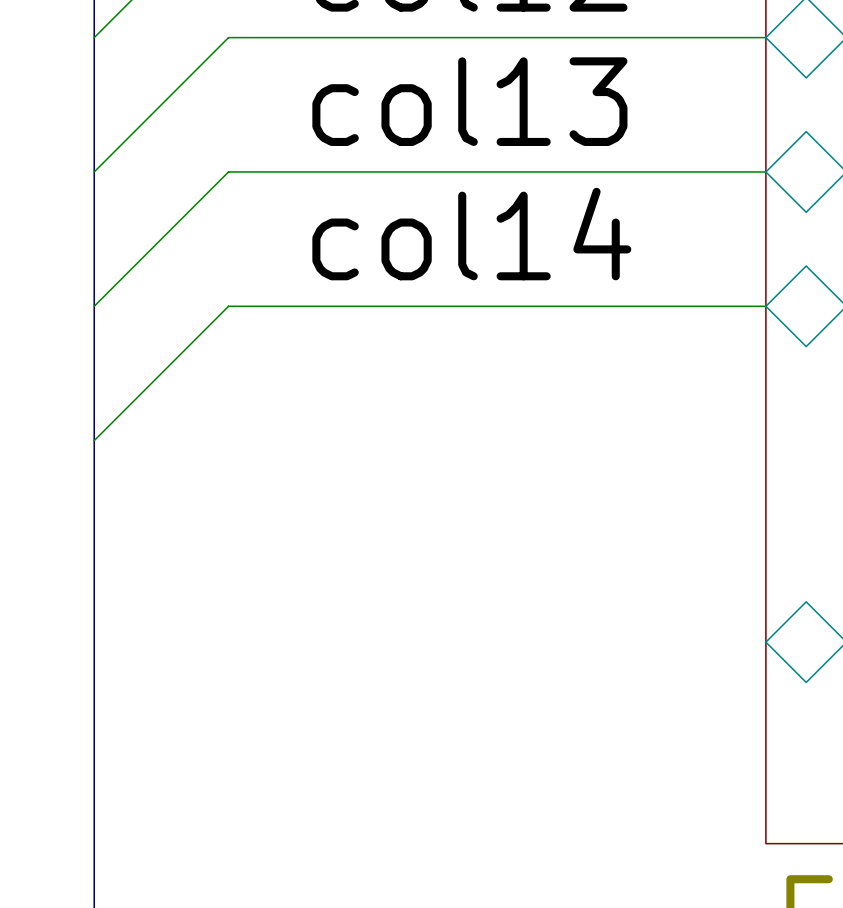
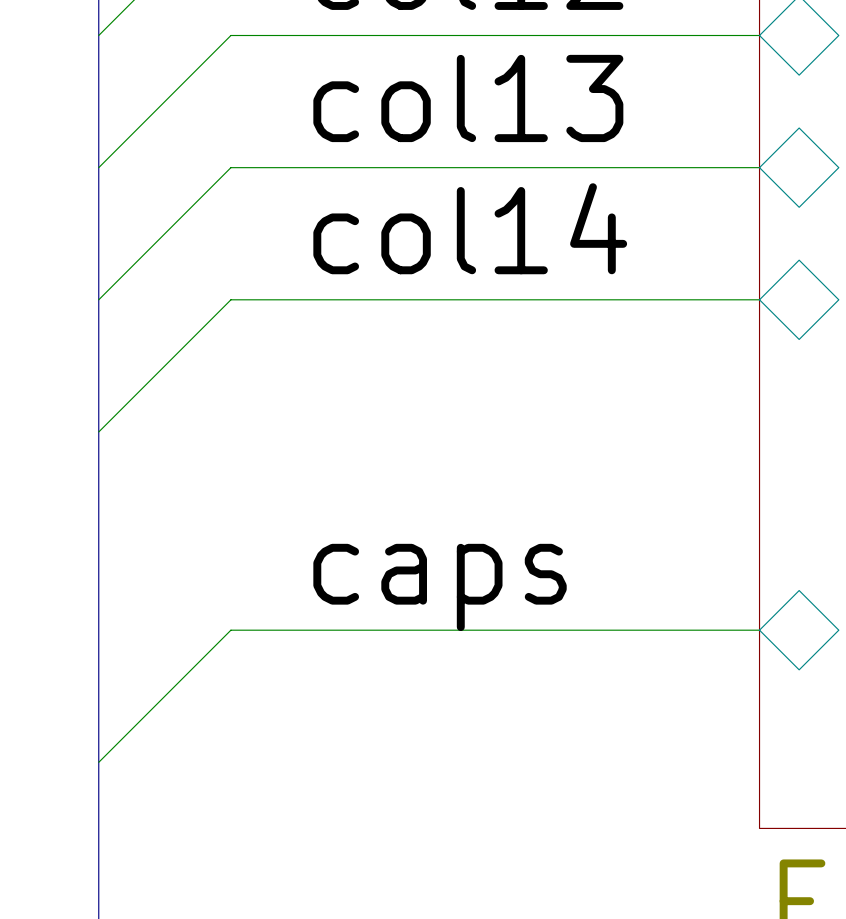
label: none -> caps (440, 587)
wire: none -> (759, 630) (230, 630) (98, 762)

